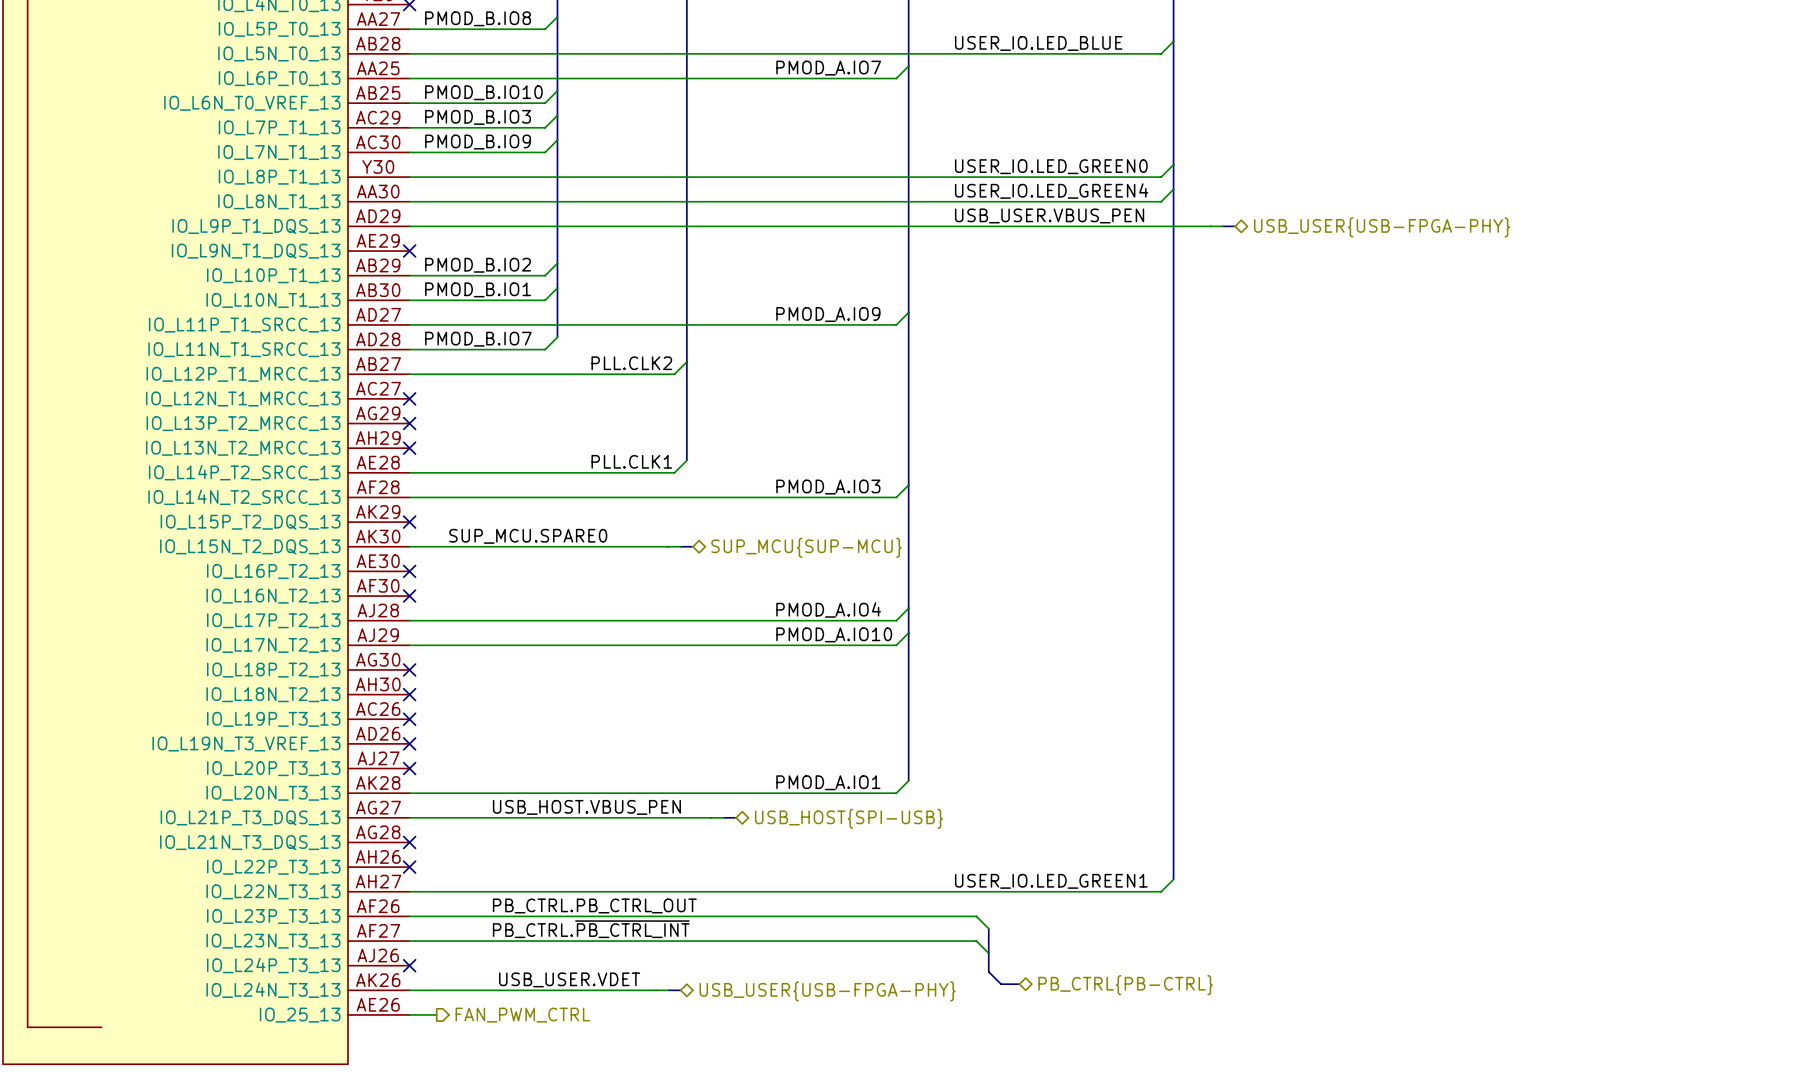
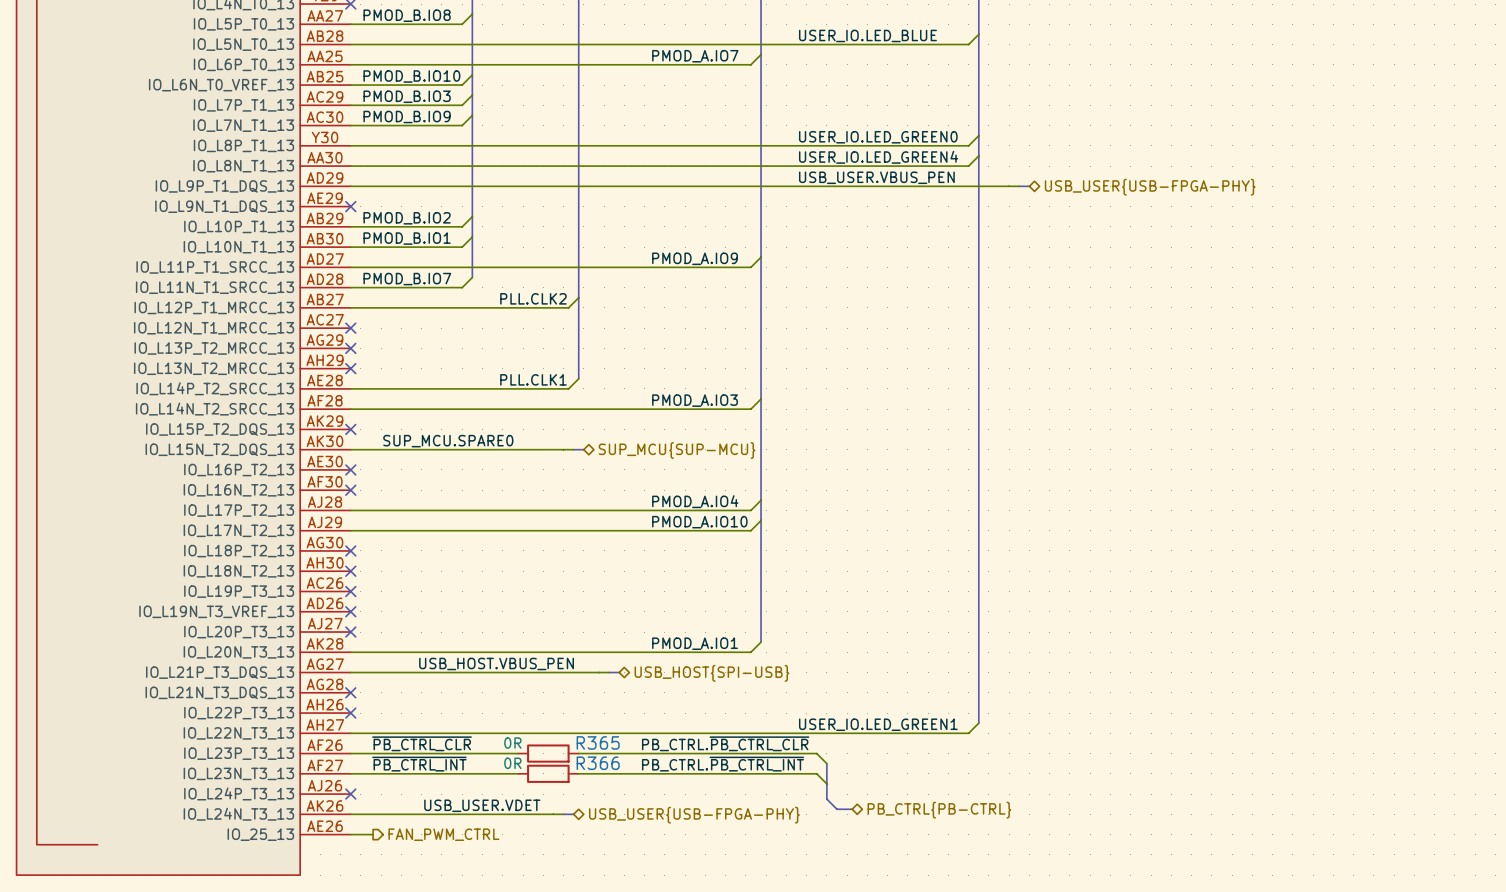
label: none -> ~{PB_CTRL_CLR} (422, 743)
label: none -> PB_CTRL.~{PB_CTRL_CLR} (725, 743)
label: PB_CTRL.PB_CTRL_OUT (594, 905) -> none
wire: (612, 916) (686, 916) -> none
R365: none -> (548, 753)
label: none -> ~{PB_CTRL_INT} (419, 764)
label: PB_CTRL.~{PB_CTRL_INT} (591, 929) -> none
label: none -> PB_CTRL.~{PB_CTRL_INT} (723, 764)
wire: (612, 941) (686, 941) -> none
R366: none -> (548, 773)

